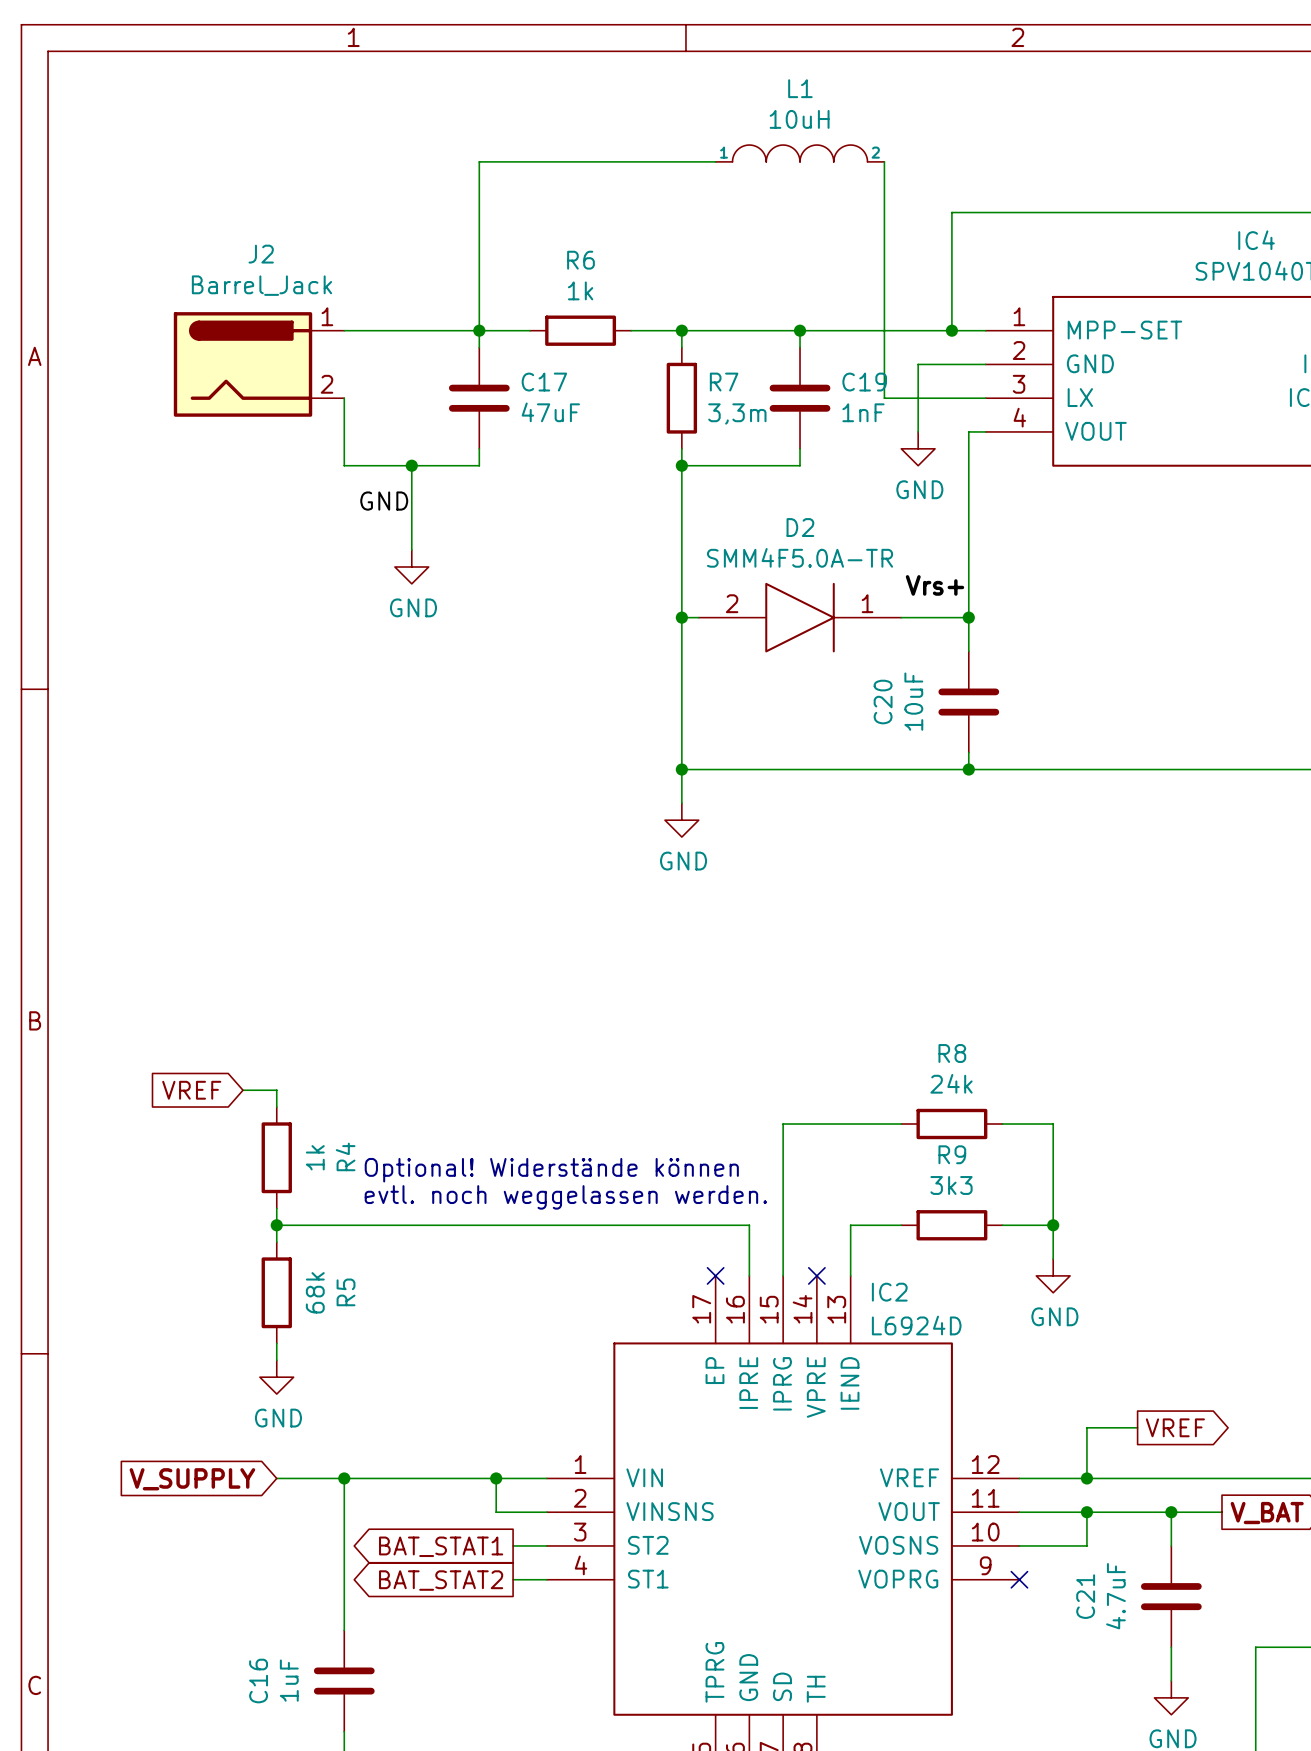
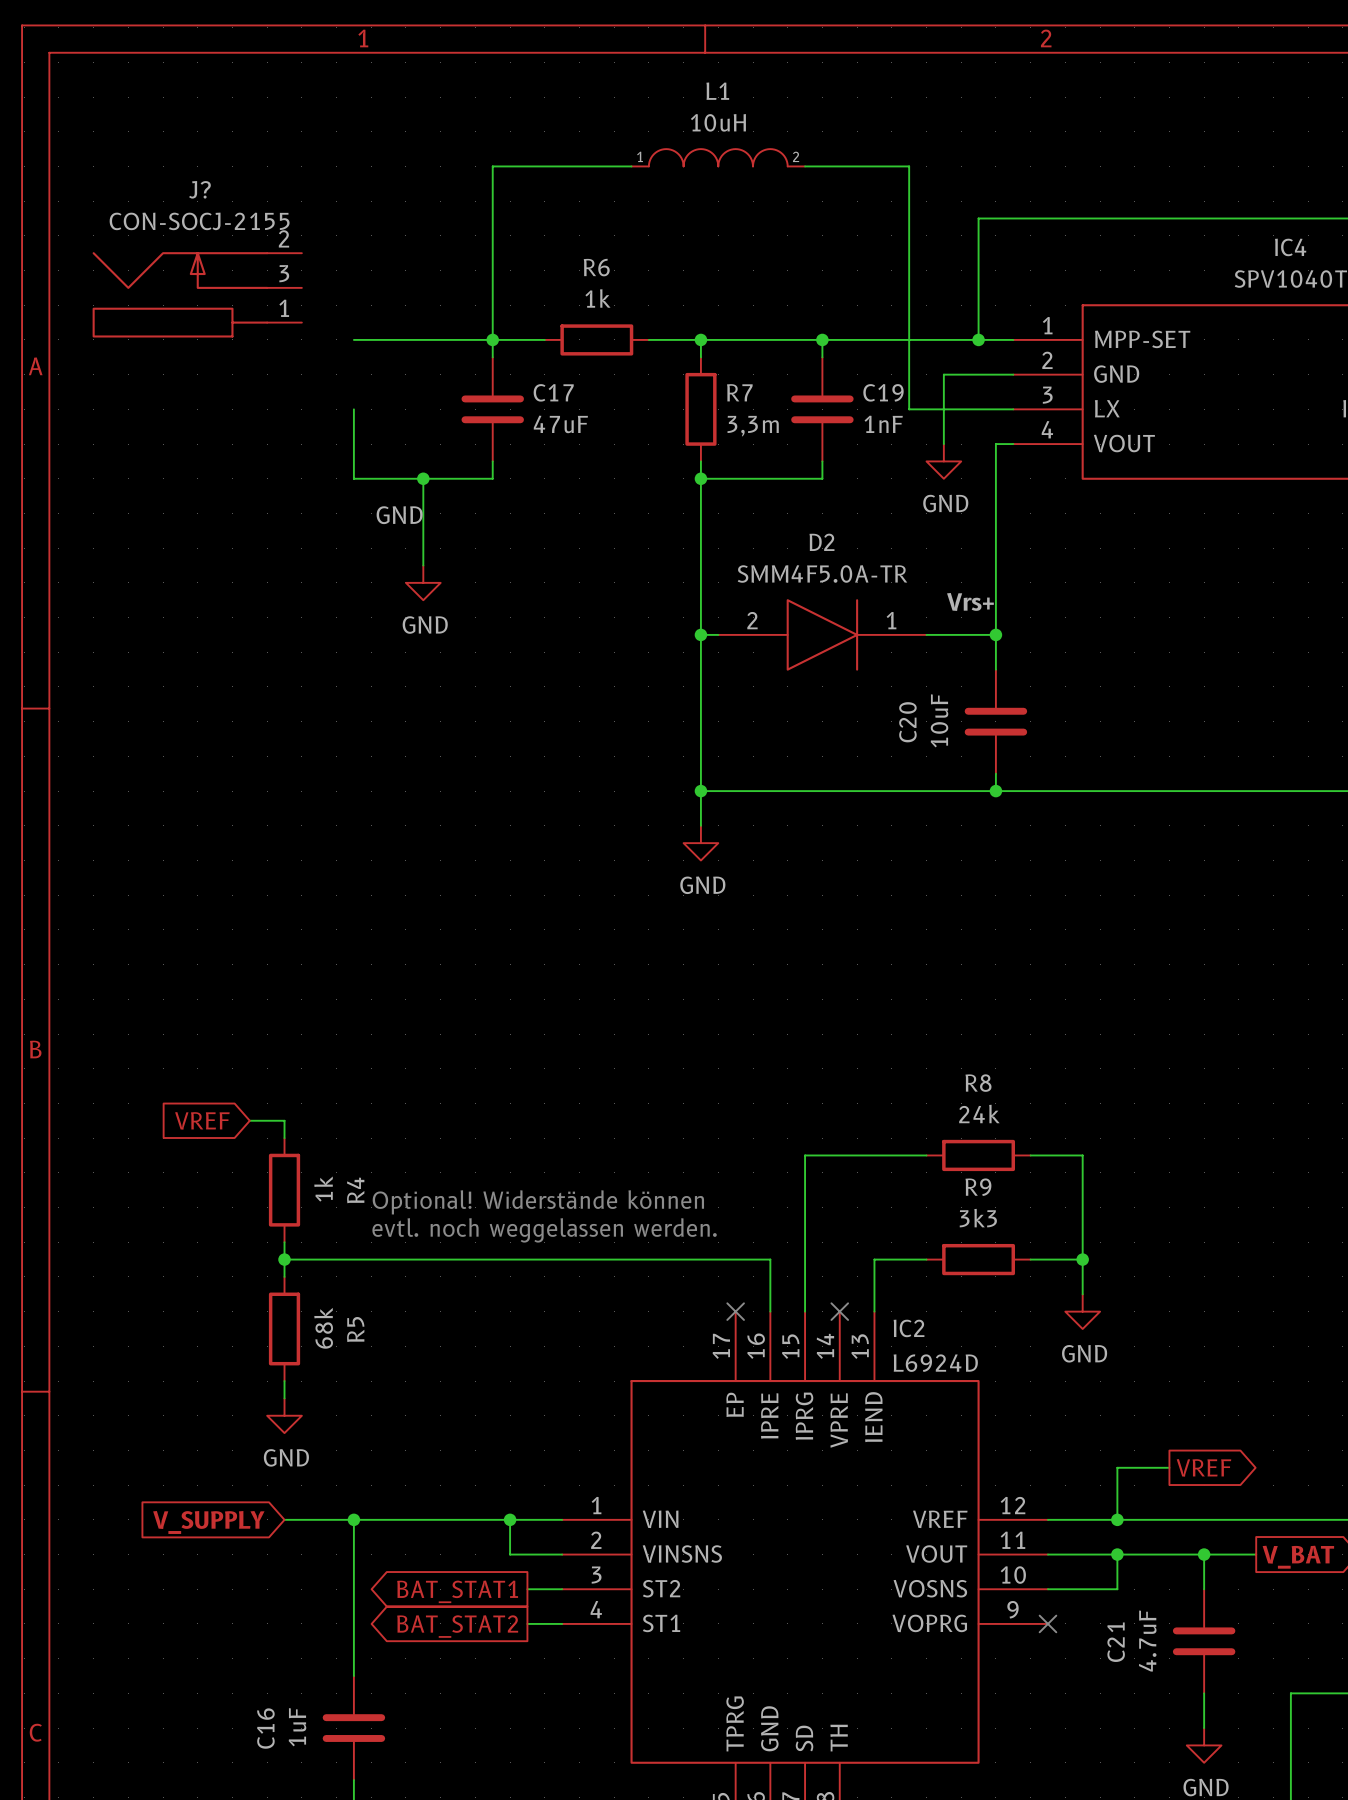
L1 position: (800, 153) -> (718, 157)
wire: (614, 161) (715, 161) -> (805, 166) (909, 166)
J?: none -> CON-SOCJ-2155 (197, 294)
J2: Barrel_Jack (259, 364) -> none

